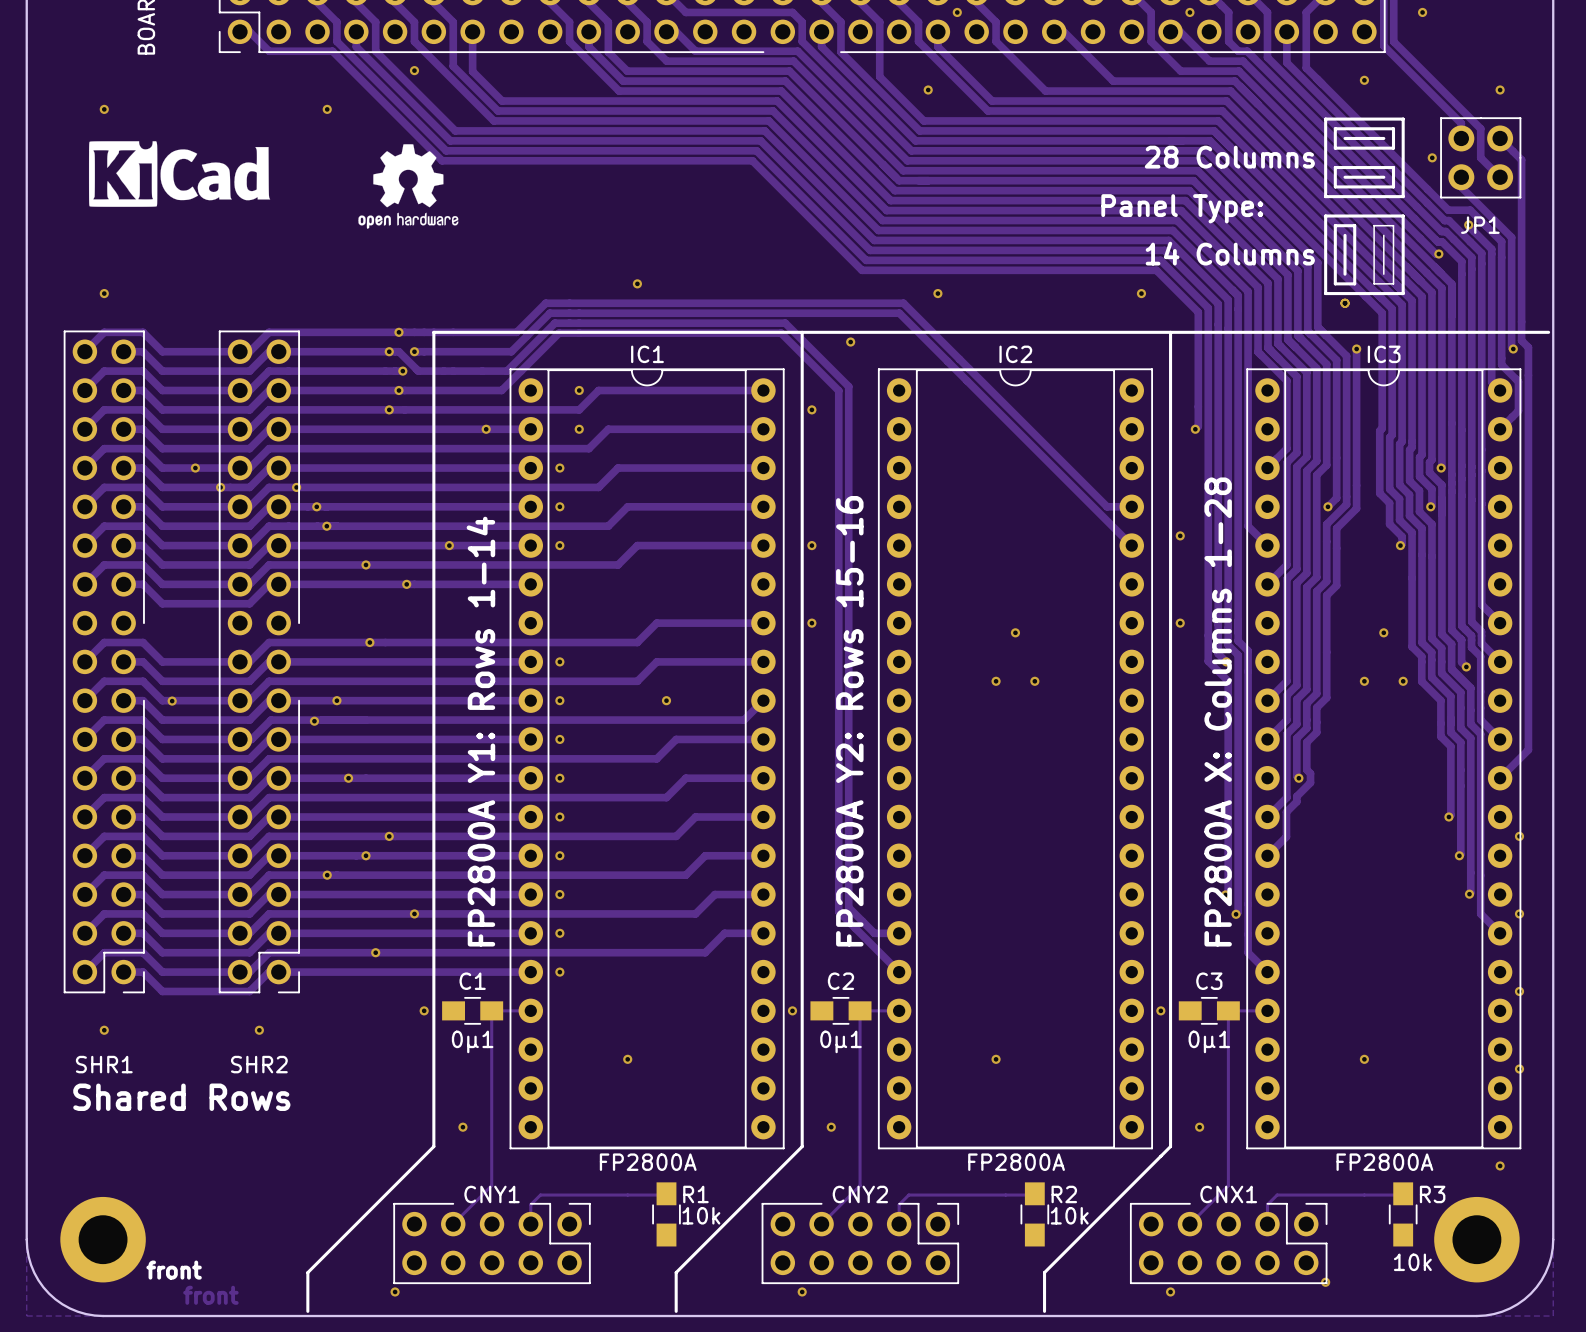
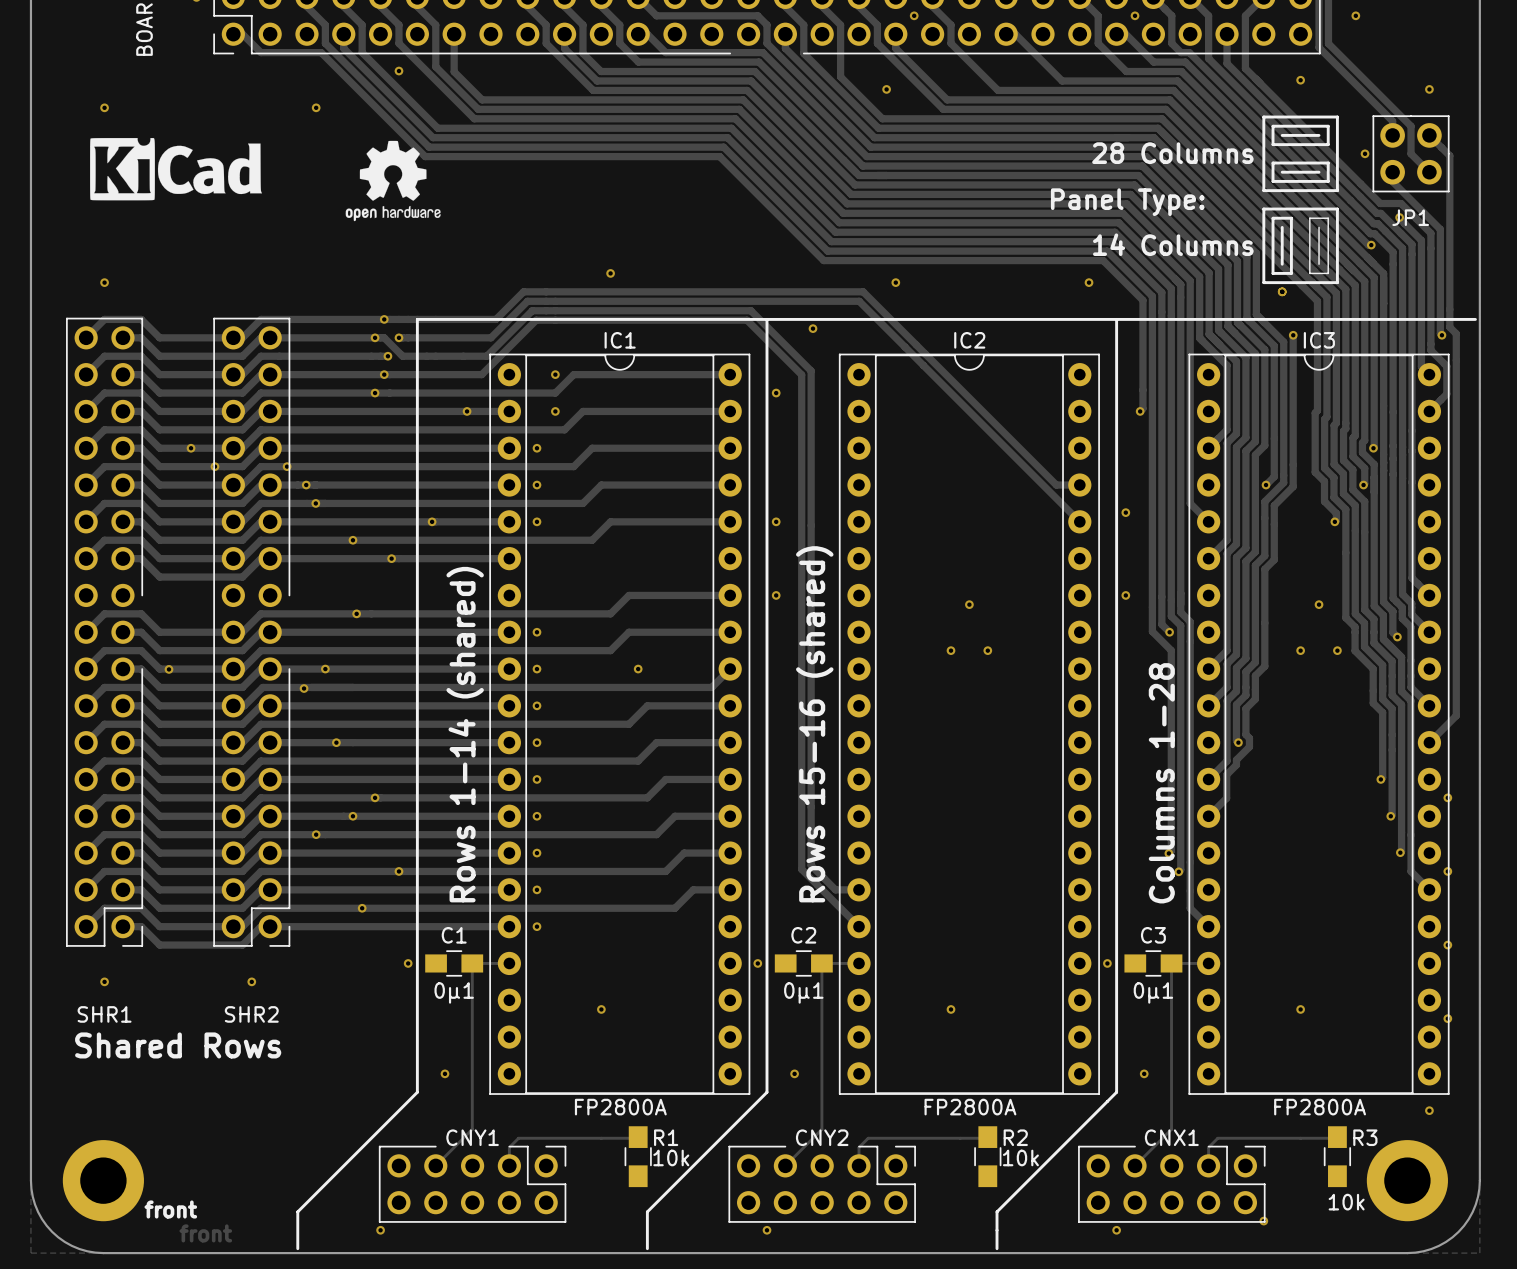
text: FP2800A X: Columns 1-28 (1218, 711) -> Columns 1-28 (1161, 783)
text: FP2800A Y2: Rows 15-16 (849, 721) -> Rows 15-16 (shared) (814, 724)
text: FP2800A Y1: Rows 1-14 (480, 731) -> Rows 1-14 (shared) (465, 734)

